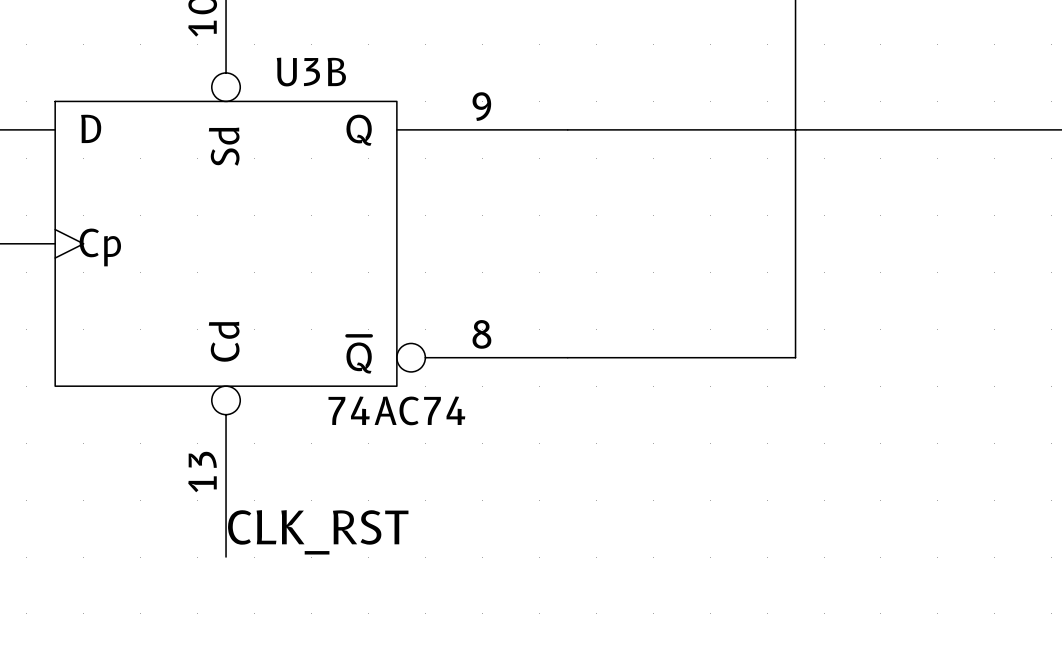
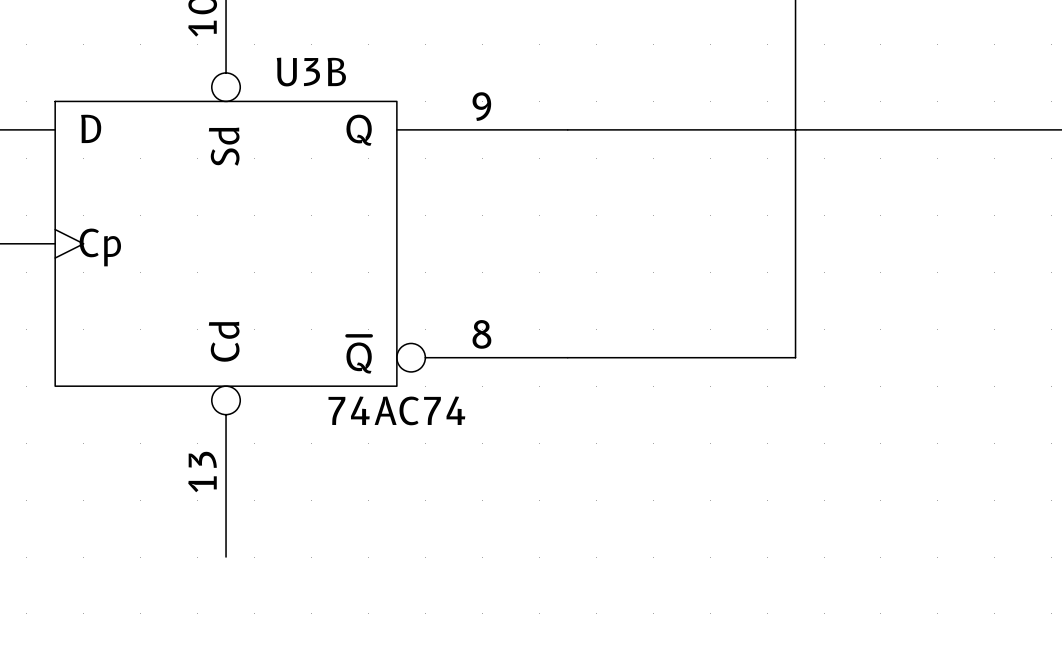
label: CLK_RST (318, 532) -> none

